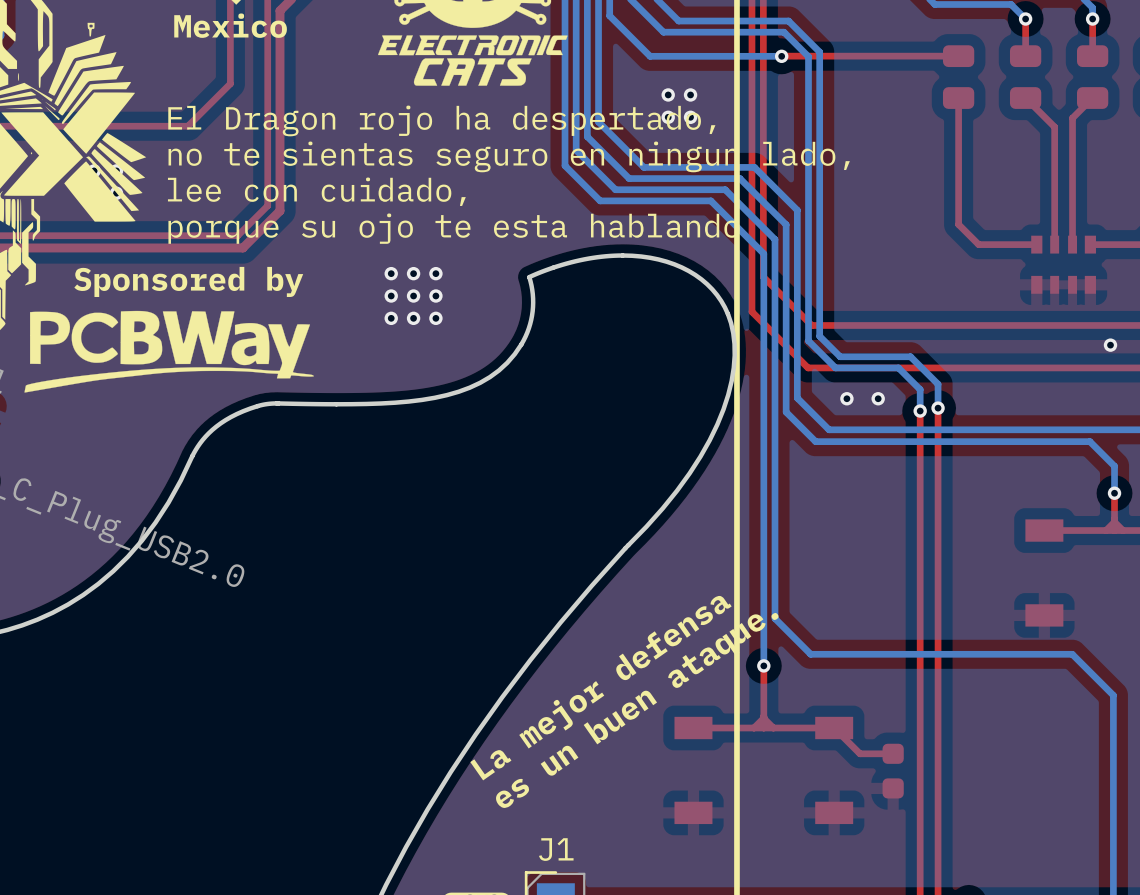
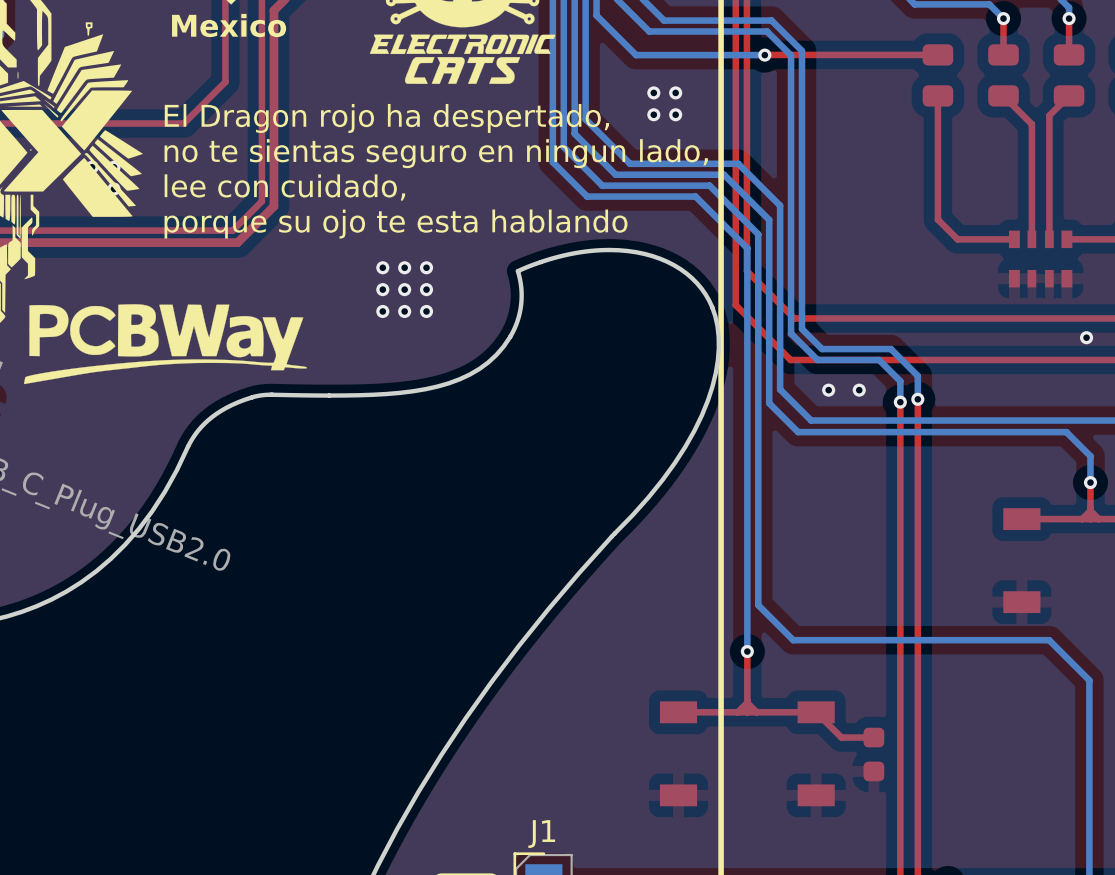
text: Sponsored by (188, 281) -> none
text: La mejor defensa (600, 688) -> none
text: es un buen ataque. (637, 710) -> none

